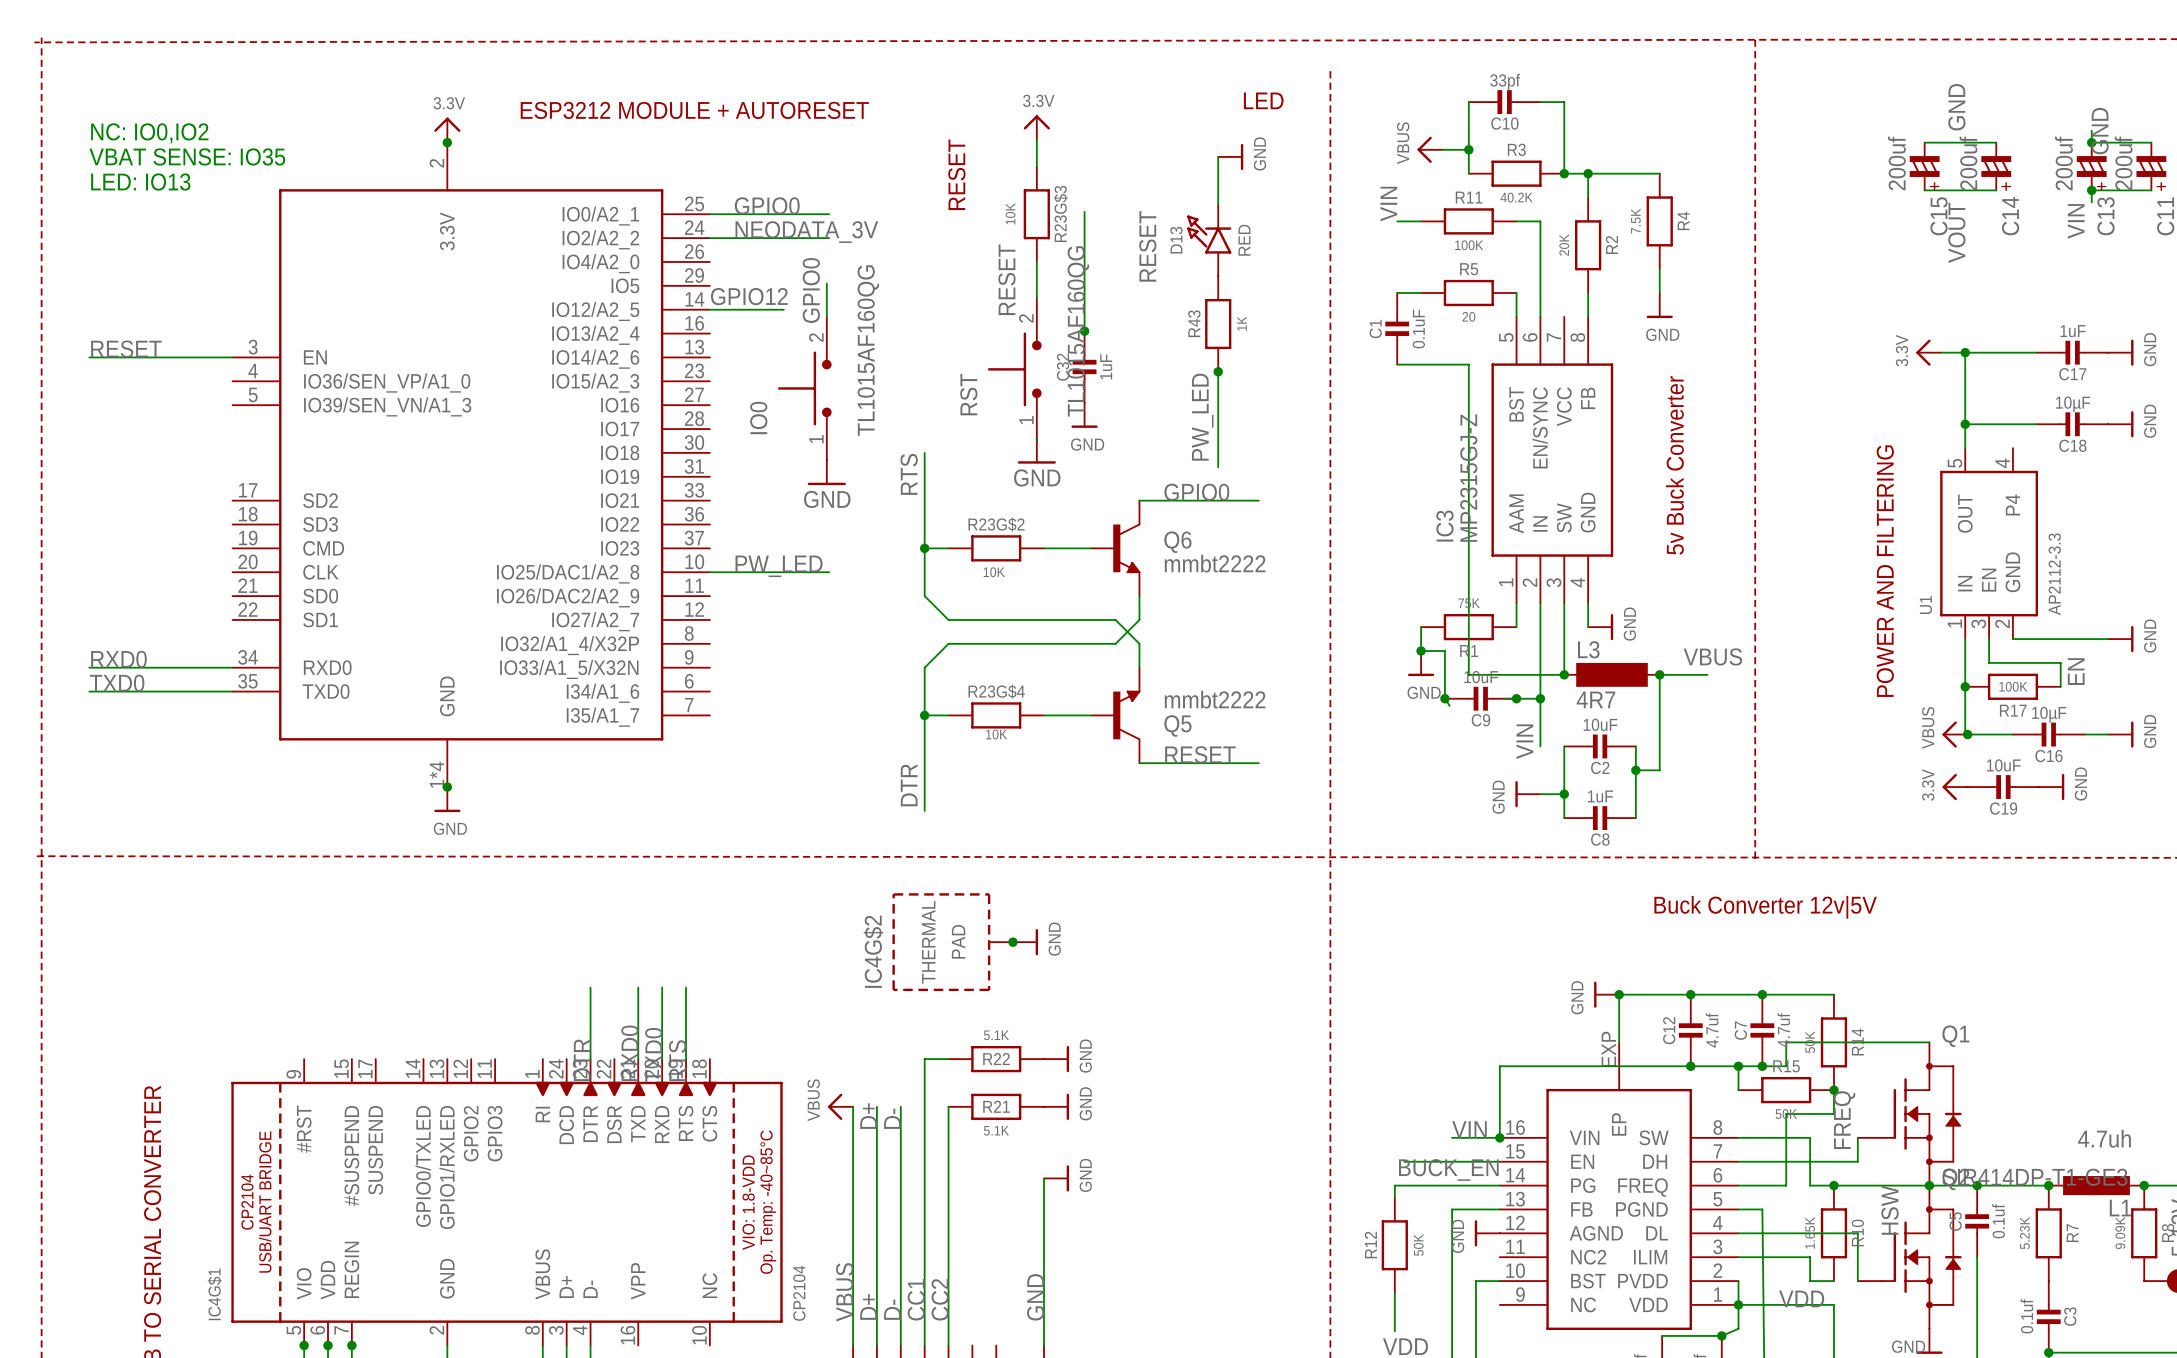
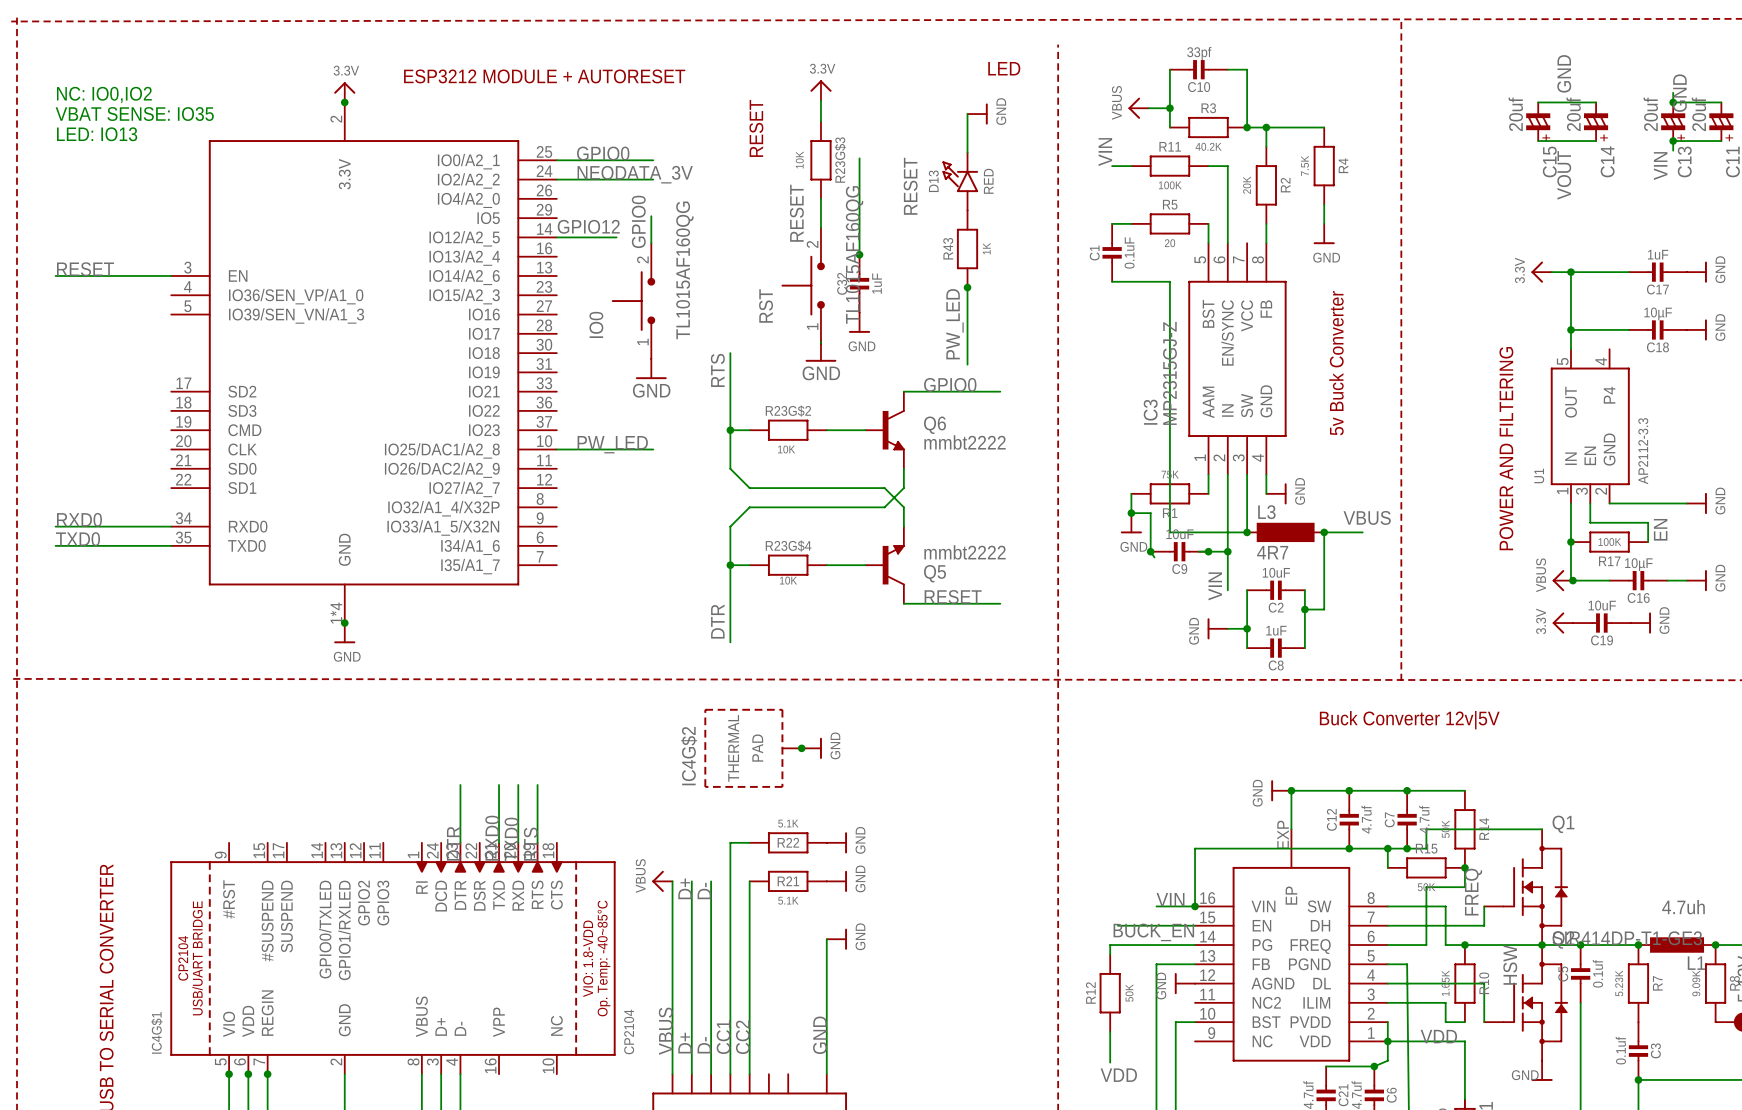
C15 value: 200uf (1896, 163) -> 20uf (1515, 114)
C14 value: 200uf (1968, 163) -> 20uf (1573, 114)
C13 value: 200uf (2063, 163) -> 20uf (1650, 114)
C11 value: 200uf (2123, 163) -> 20uf (1698, 114)

